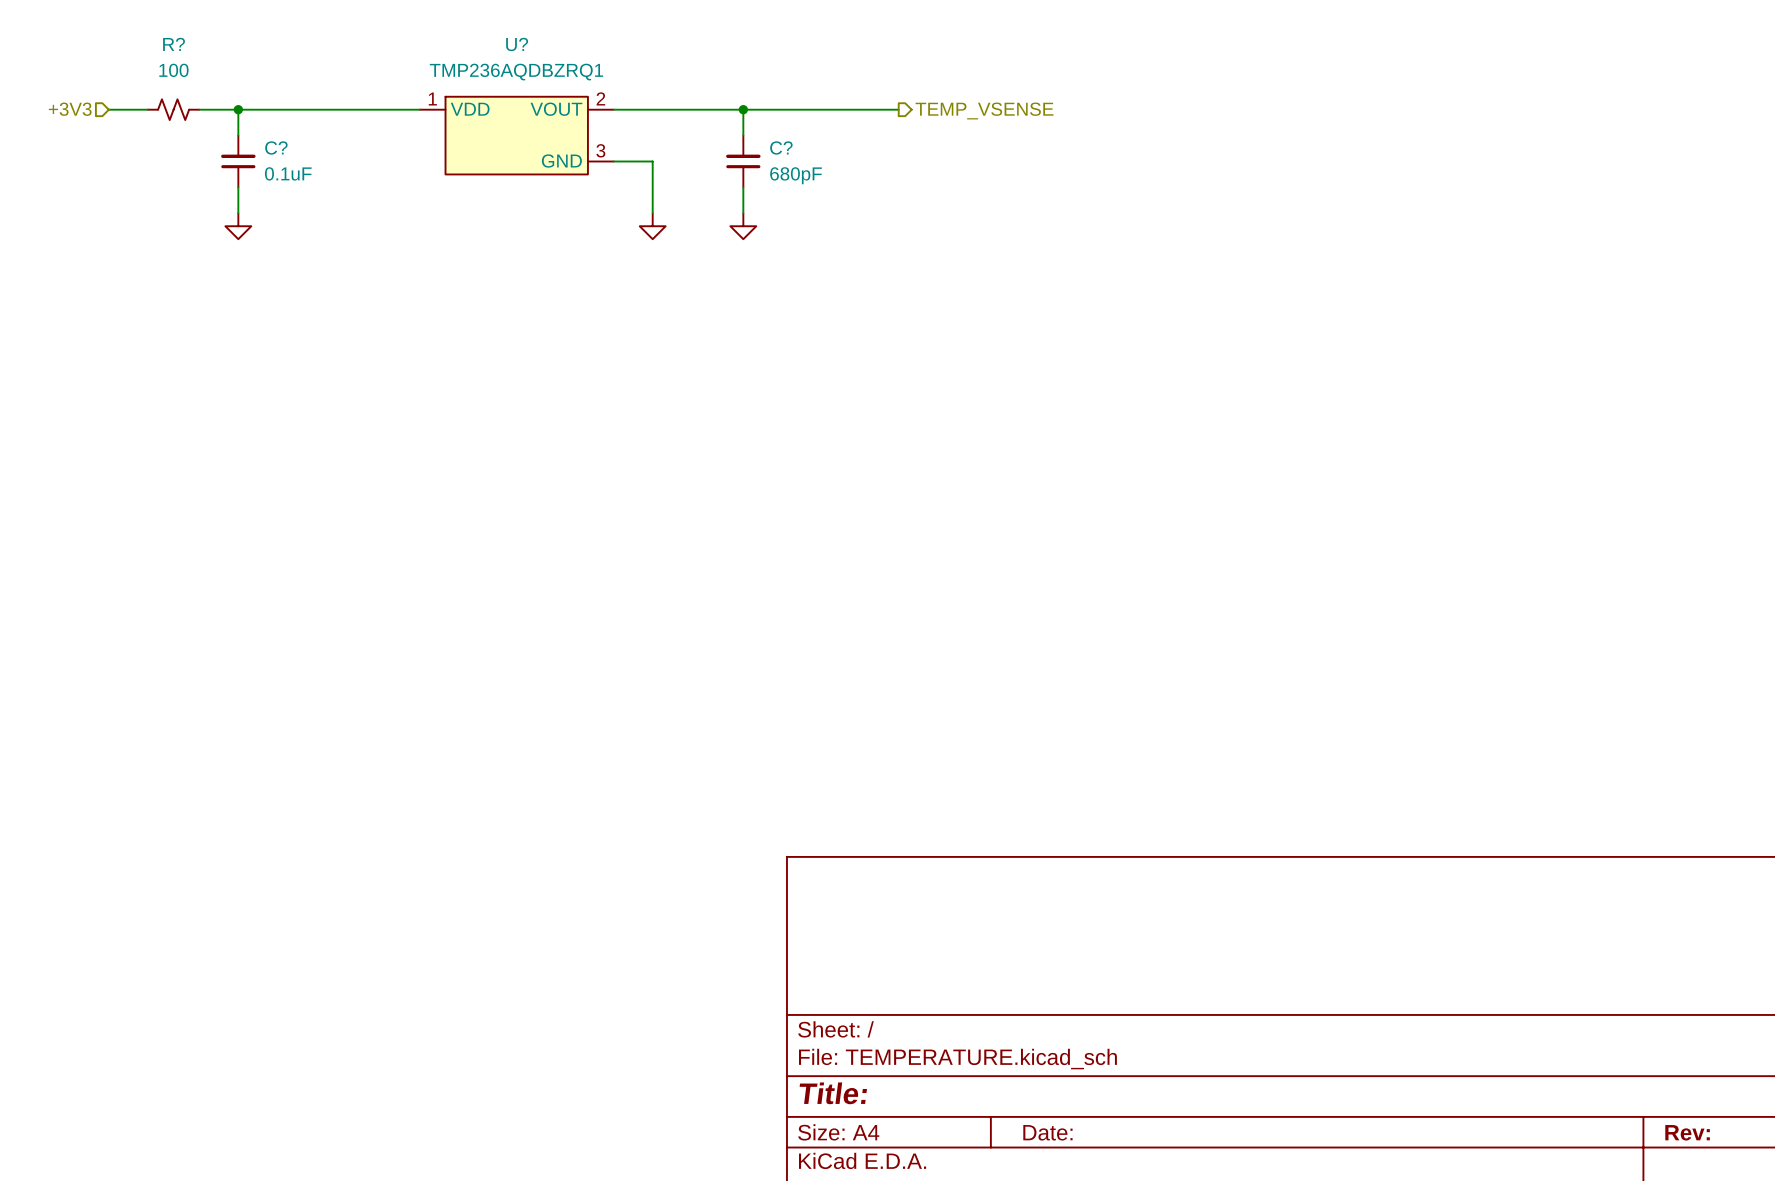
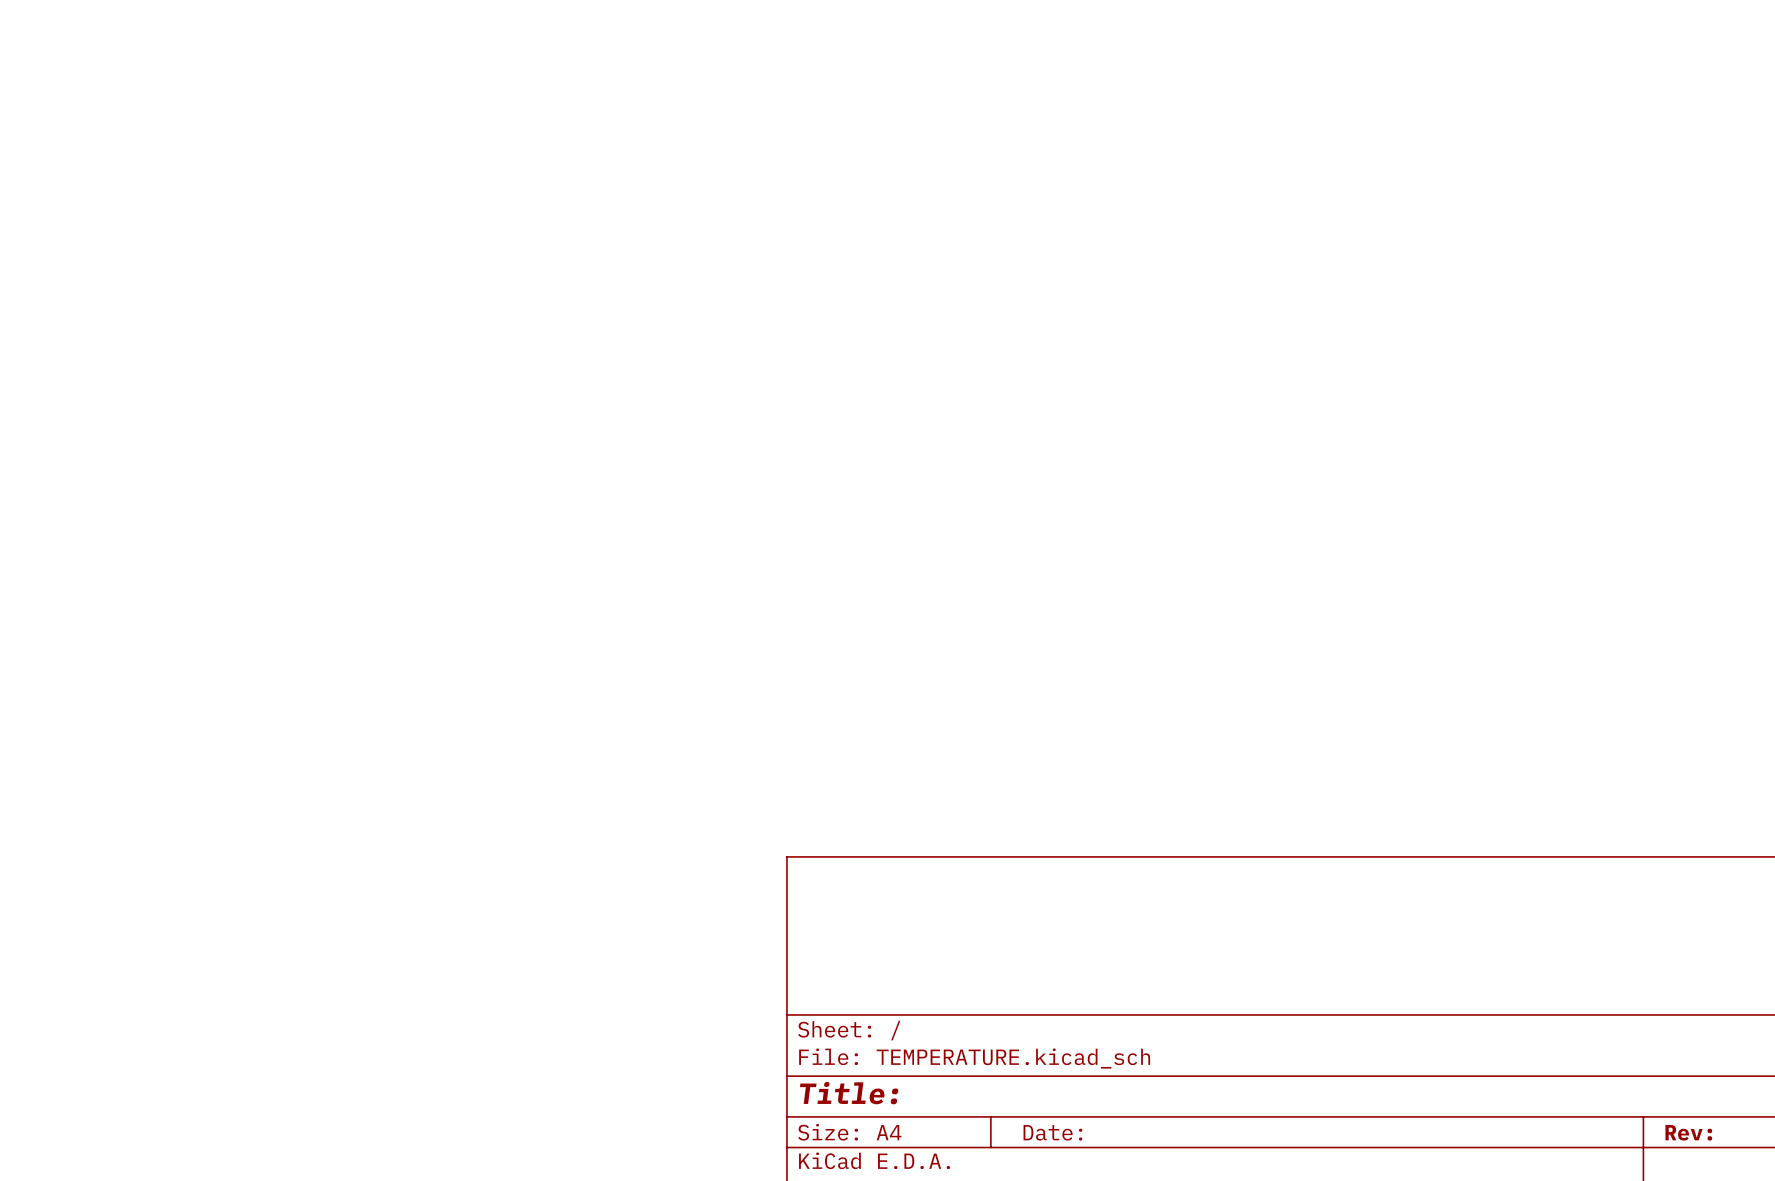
hierarchical label: +3V3 (70, 109) -> none
wire: (108, 109) (147, 109) -> none
R?: 100 (173, 109) -> none
wire: (199, 109) (419, 109) -> none
wire: (238, 109) (238, 135) -> none
junction: (238, 109) -> none
wire: (613, 109) (898, 109) -> none
wire: (743, 109) (743, 135) -> none
junction: (743, 109) -> none
hierarchical label: TEMP_VSENSE (984, 110) -> none
U?: TMP236AQDBZRQ1 (516, 135) -> none
C?: 0.1uF (238, 161) -> none
wire: (613, 161) (652, 161) (652, 213) -> none
C?: 680pF (743, 161) -> none
wire: (238, 187) (238, 213) -> none
wire: (743, 187) (743, 213) -> none
power symbol: (238, 226) -> none
power symbol: (652, 226) -> none
power symbol: (743, 226) -> none

